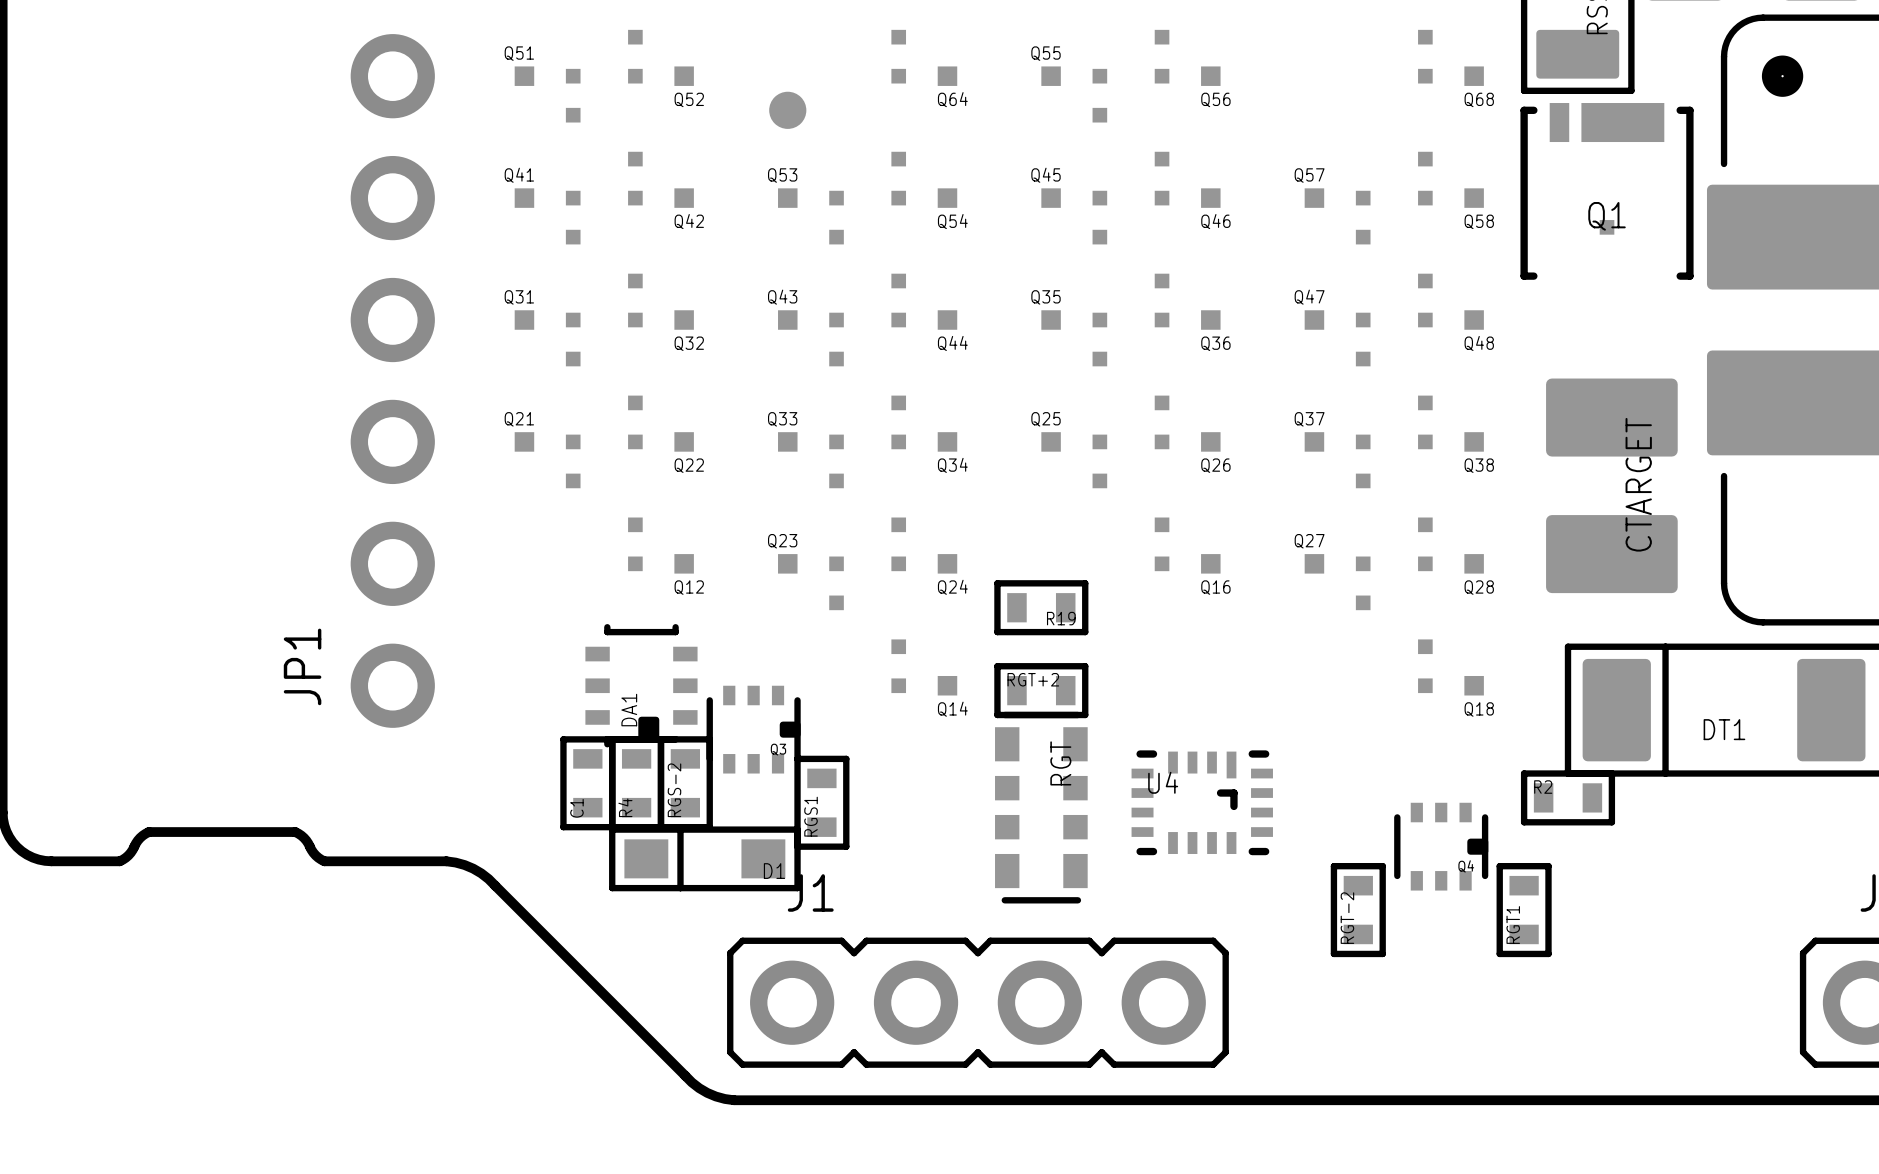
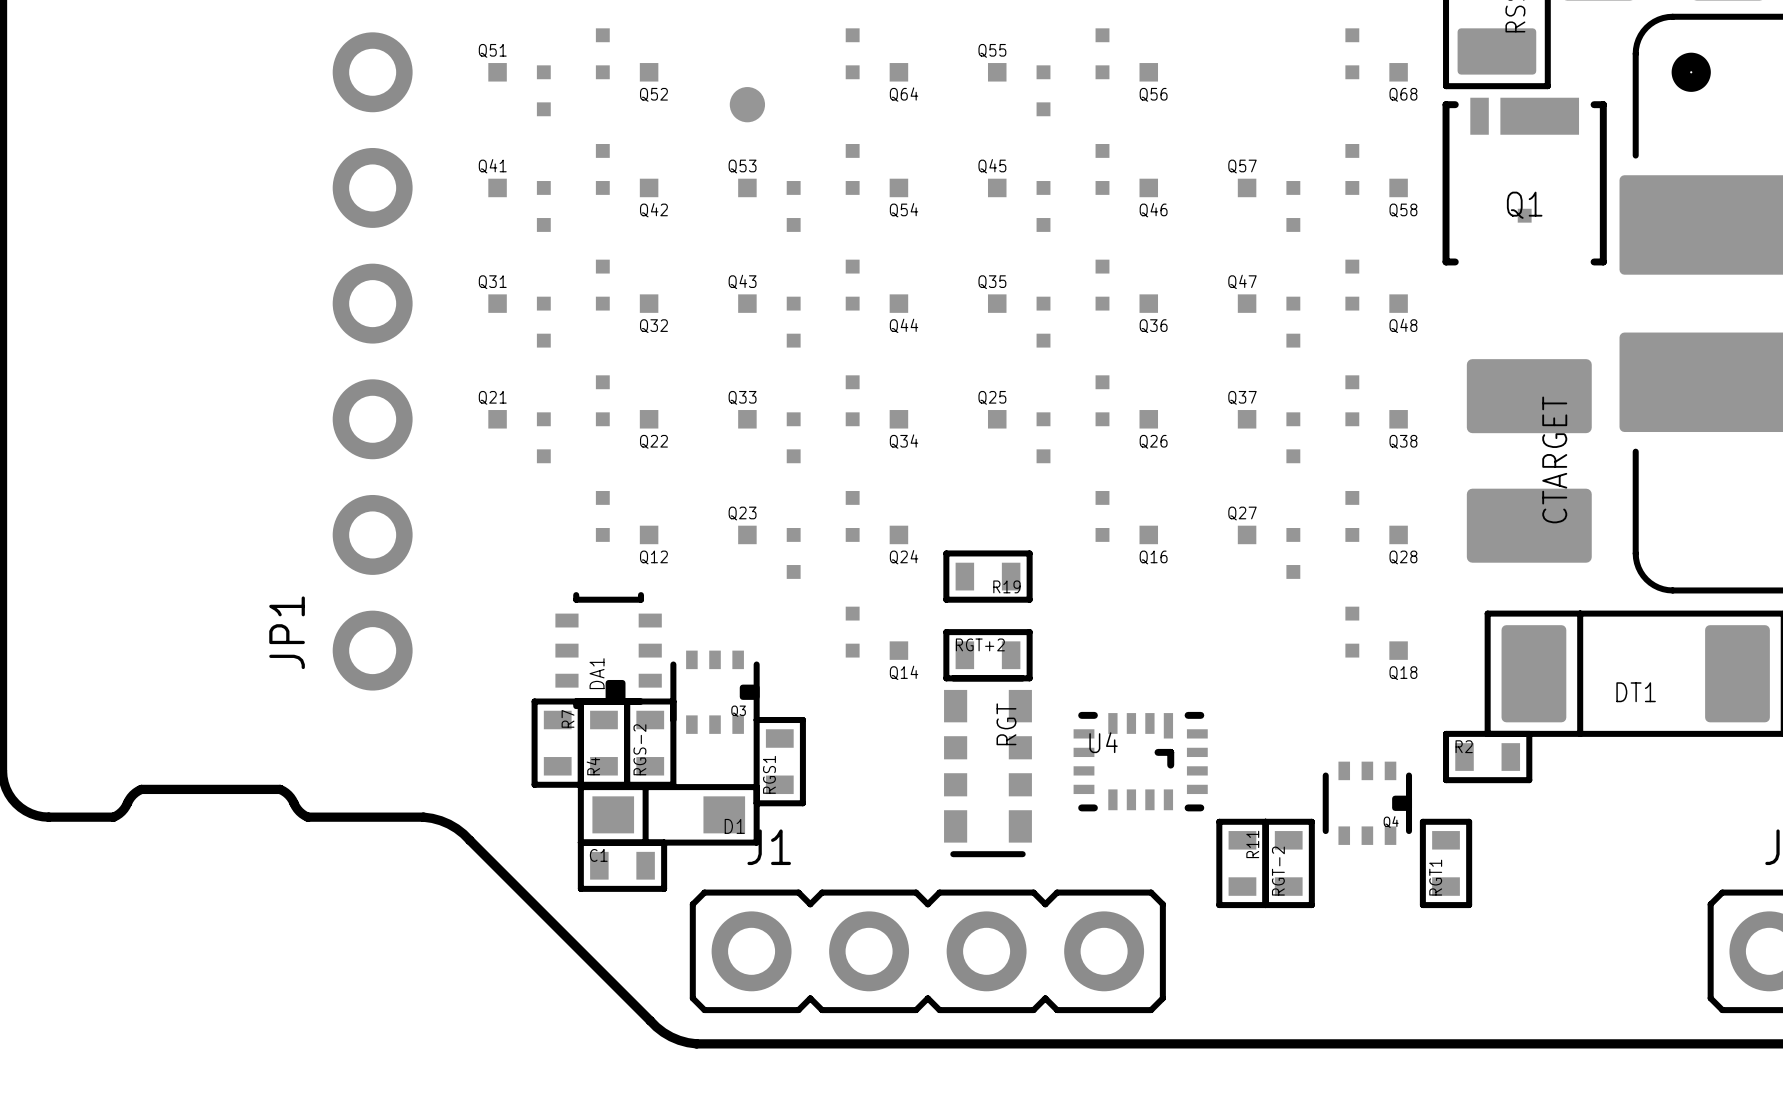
C1 name: C1 (576, 808) -> R7 (568, 718)
R11: none -> (1242, 863)
C1: none -> (622, 865)

